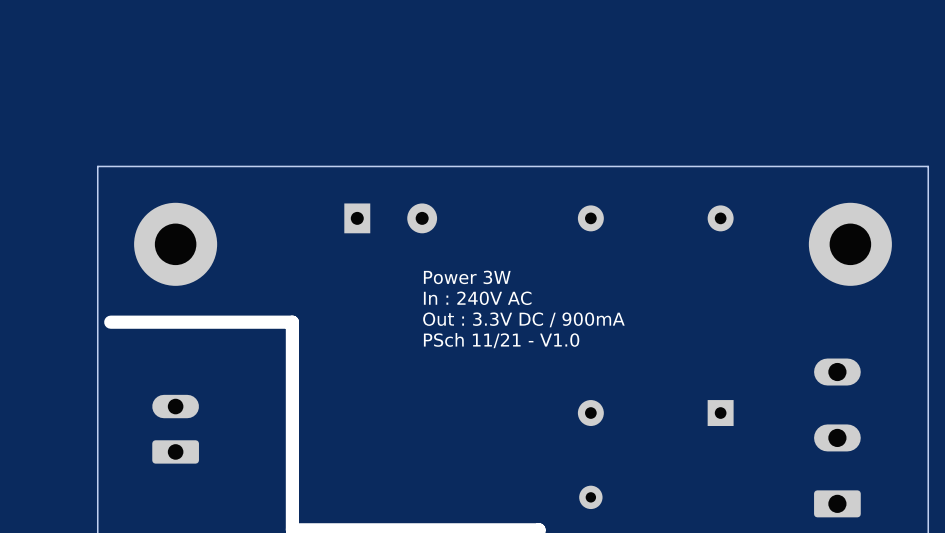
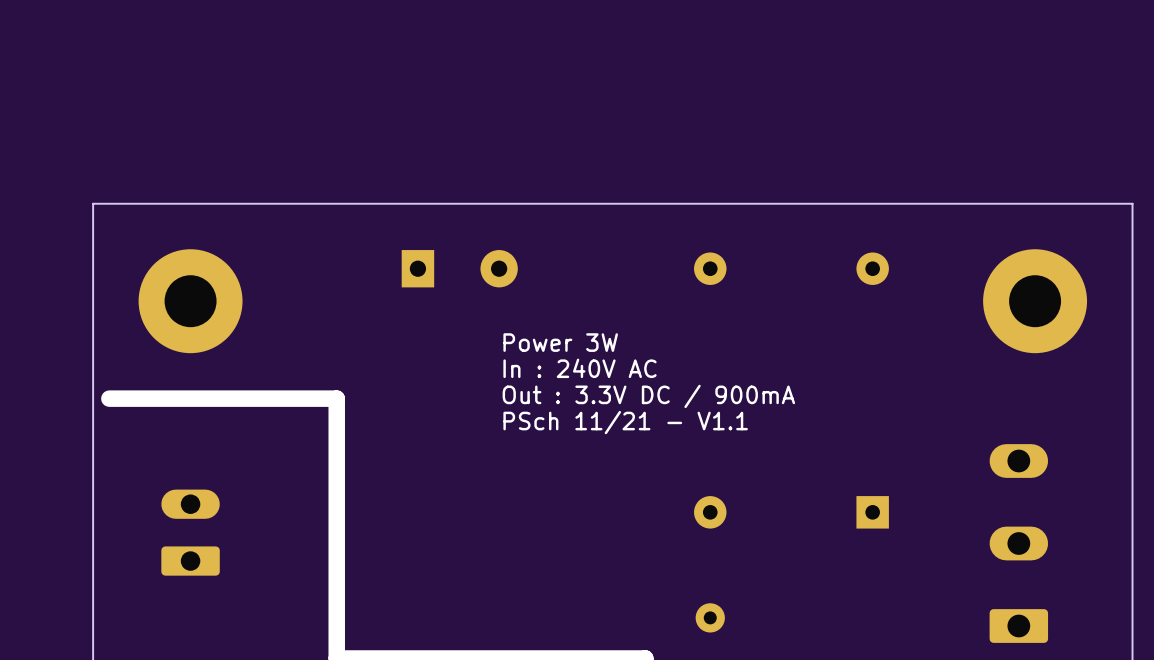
text: PSch 11/21 - V1.0 (501, 340) -> PSch 11/21 - V1.1 (625, 422)

